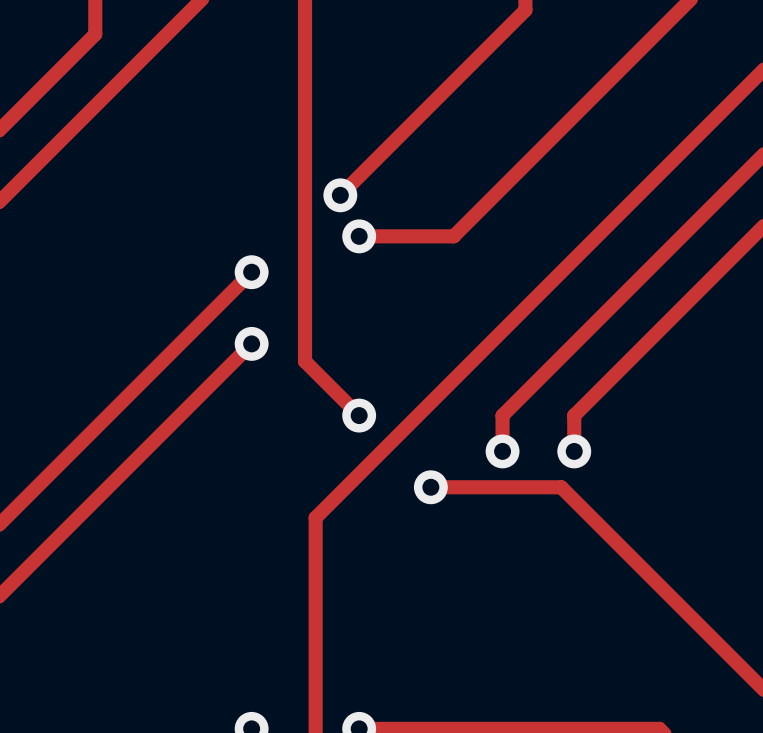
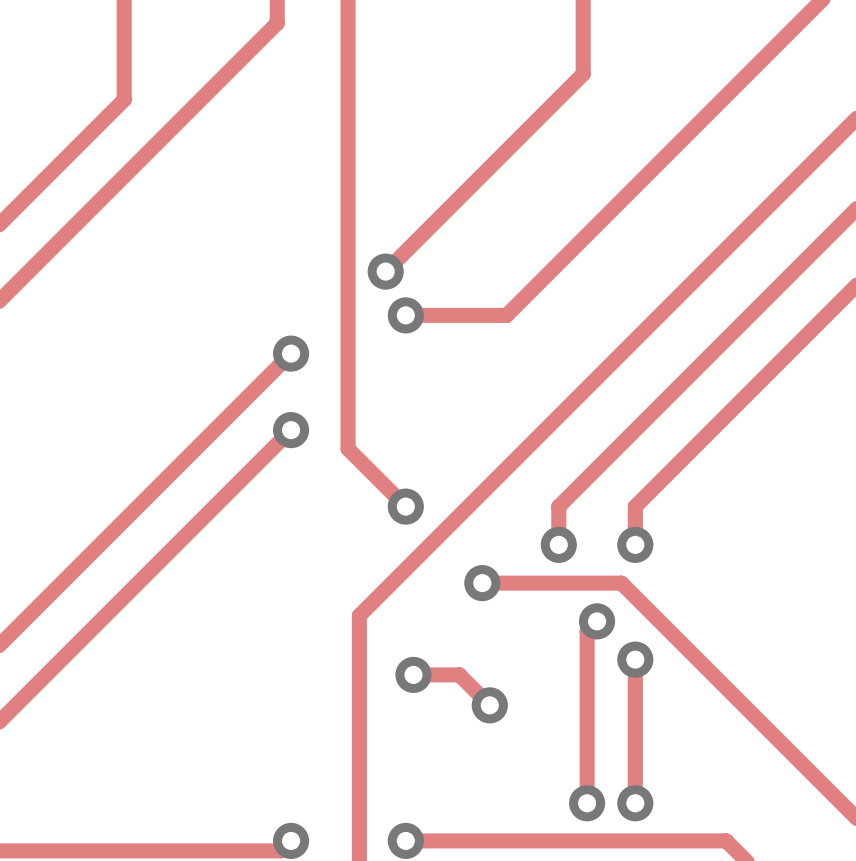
track: none -> (597, 621) (587, 631) (587, 803)
via: none -> (597, 621)
track: none -> (635, 659) (635, 803)
via: none -> (635, 659)
track: none -> (413, 674) (459, 674) (489, 705)
via: none -> (413, 674)
via: none -> (489, 705)
via: none -> (587, 803)
via: none -> (635, 803)

